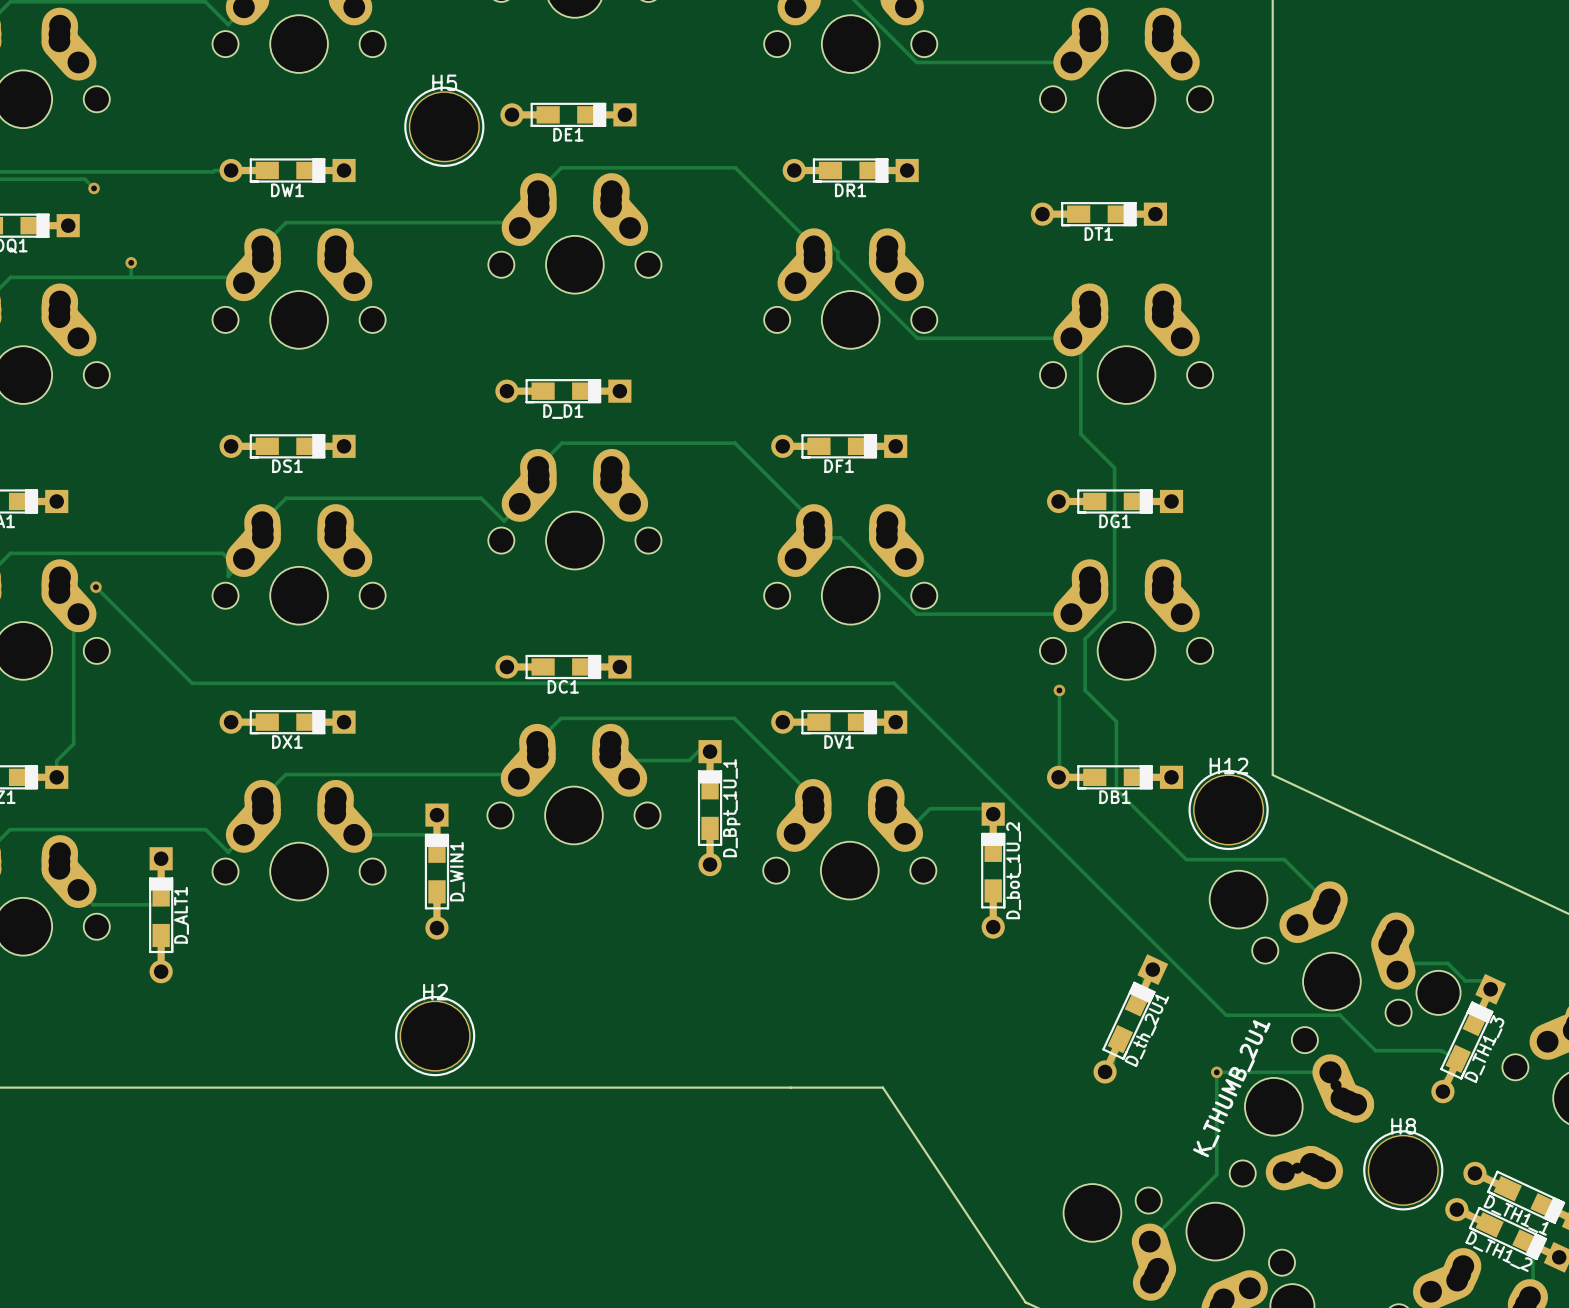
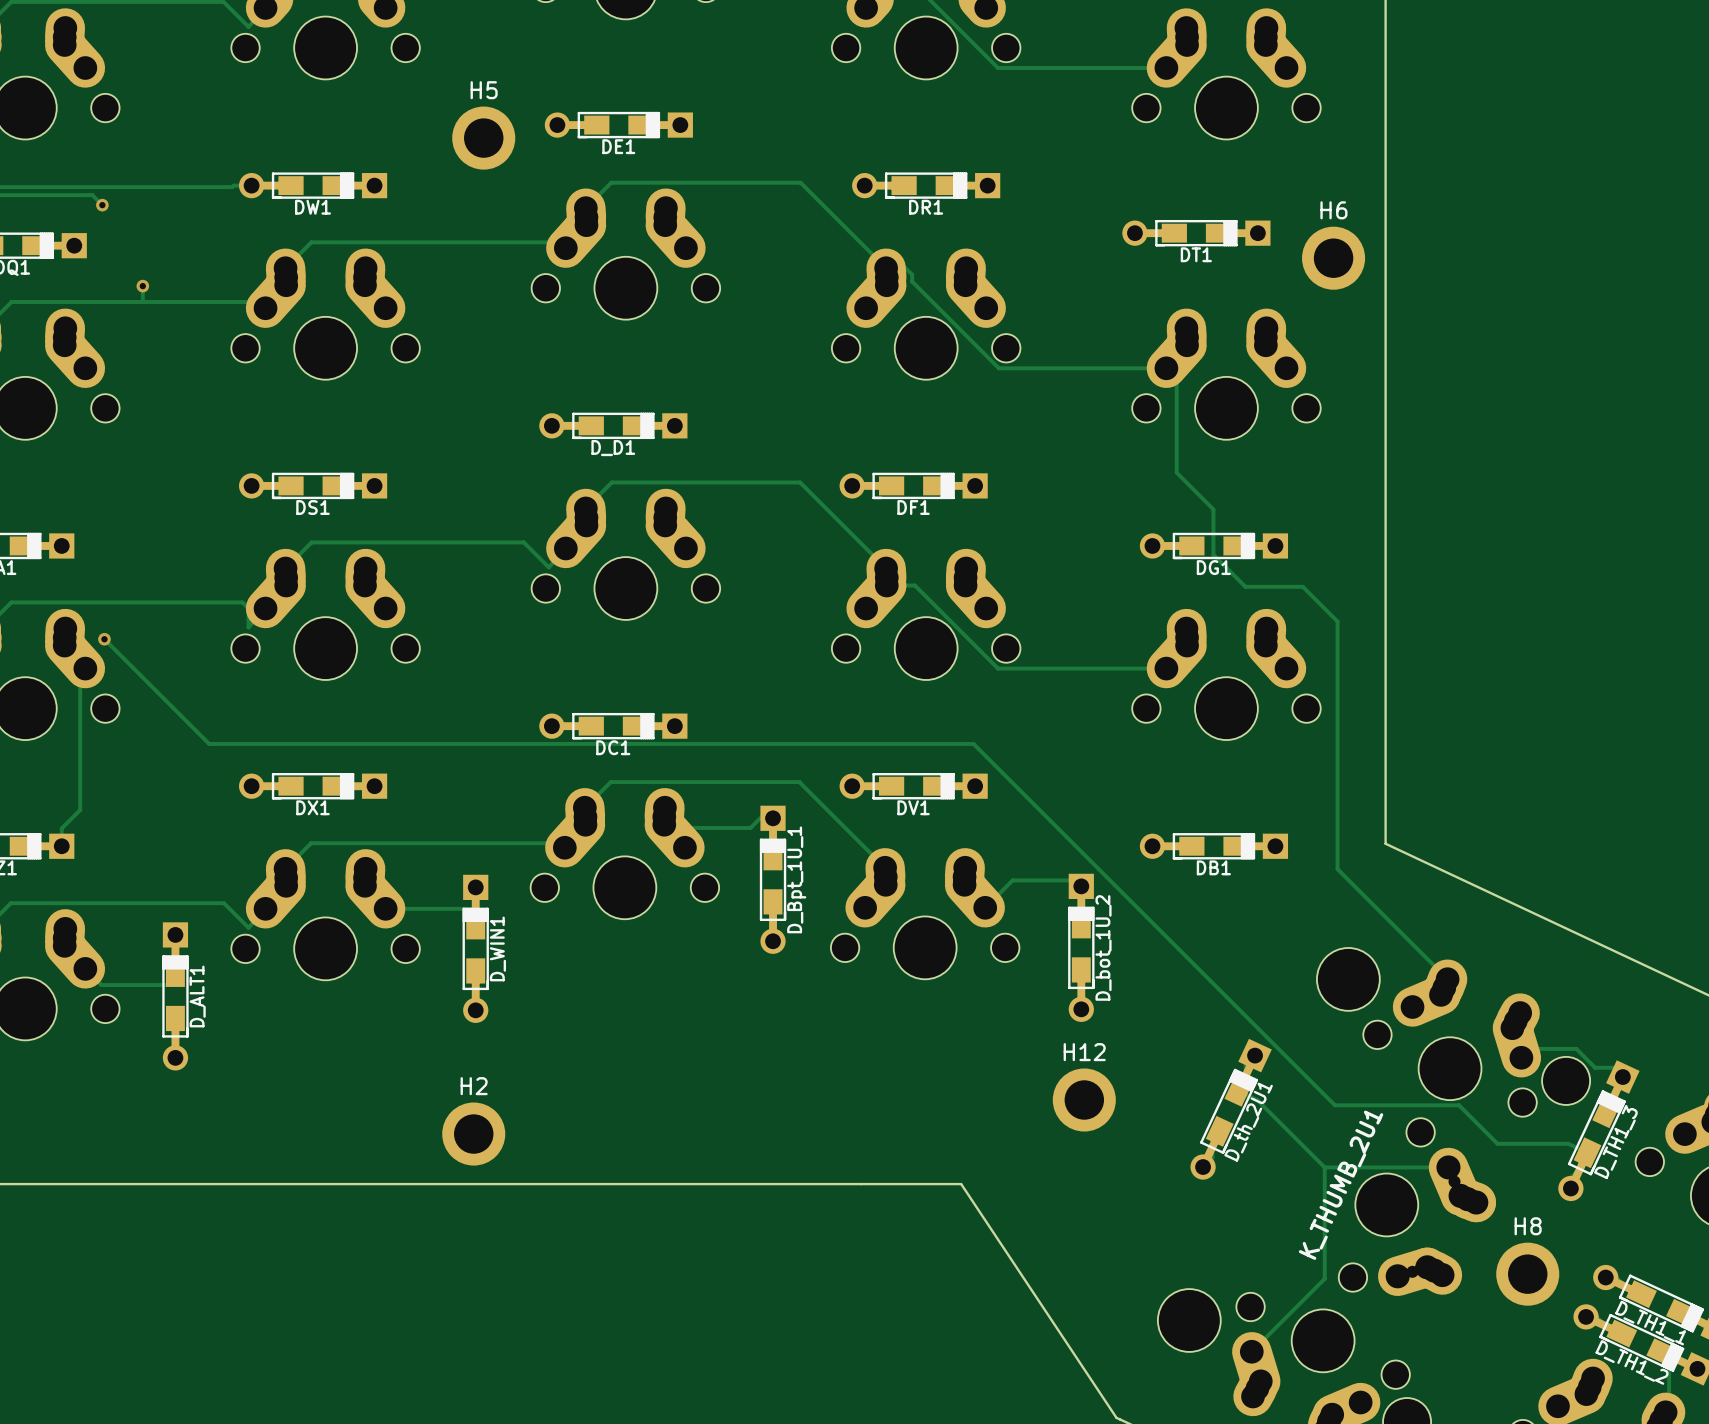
H5 footprint: [404, 86, 485, 167] -> [452, 106, 516, 170]
H6: none -> (1333, 258)
track: (1114, 509) (1114, 609) (1085, 638) (1085, 690) (1116, 721) (1116, 789) (1186, 859) (1284, 859) (1328, 903) -> (1213, 554) (1245, 586) (1302, 586) (1337, 621) (1337, 869) (1447, 979)
track: (1059, 690) (1058, 777) -> none
via: (1059, 690) -> none
H12 footprint: [1188, 769, 1269, 851] -> [1052, 1068, 1116, 1132]
H2 footprint: [395, 996, 476, 1077] -> [442, 1102, 506, 1166]
track: none -> (1238, 1091) (1257, 1100) (1324, 1167)
via: (1216, 1072) -> none
H8 footprint: [1363, 1130, 1444, 1211] -> [1496, 1242, 1560, 1306]

